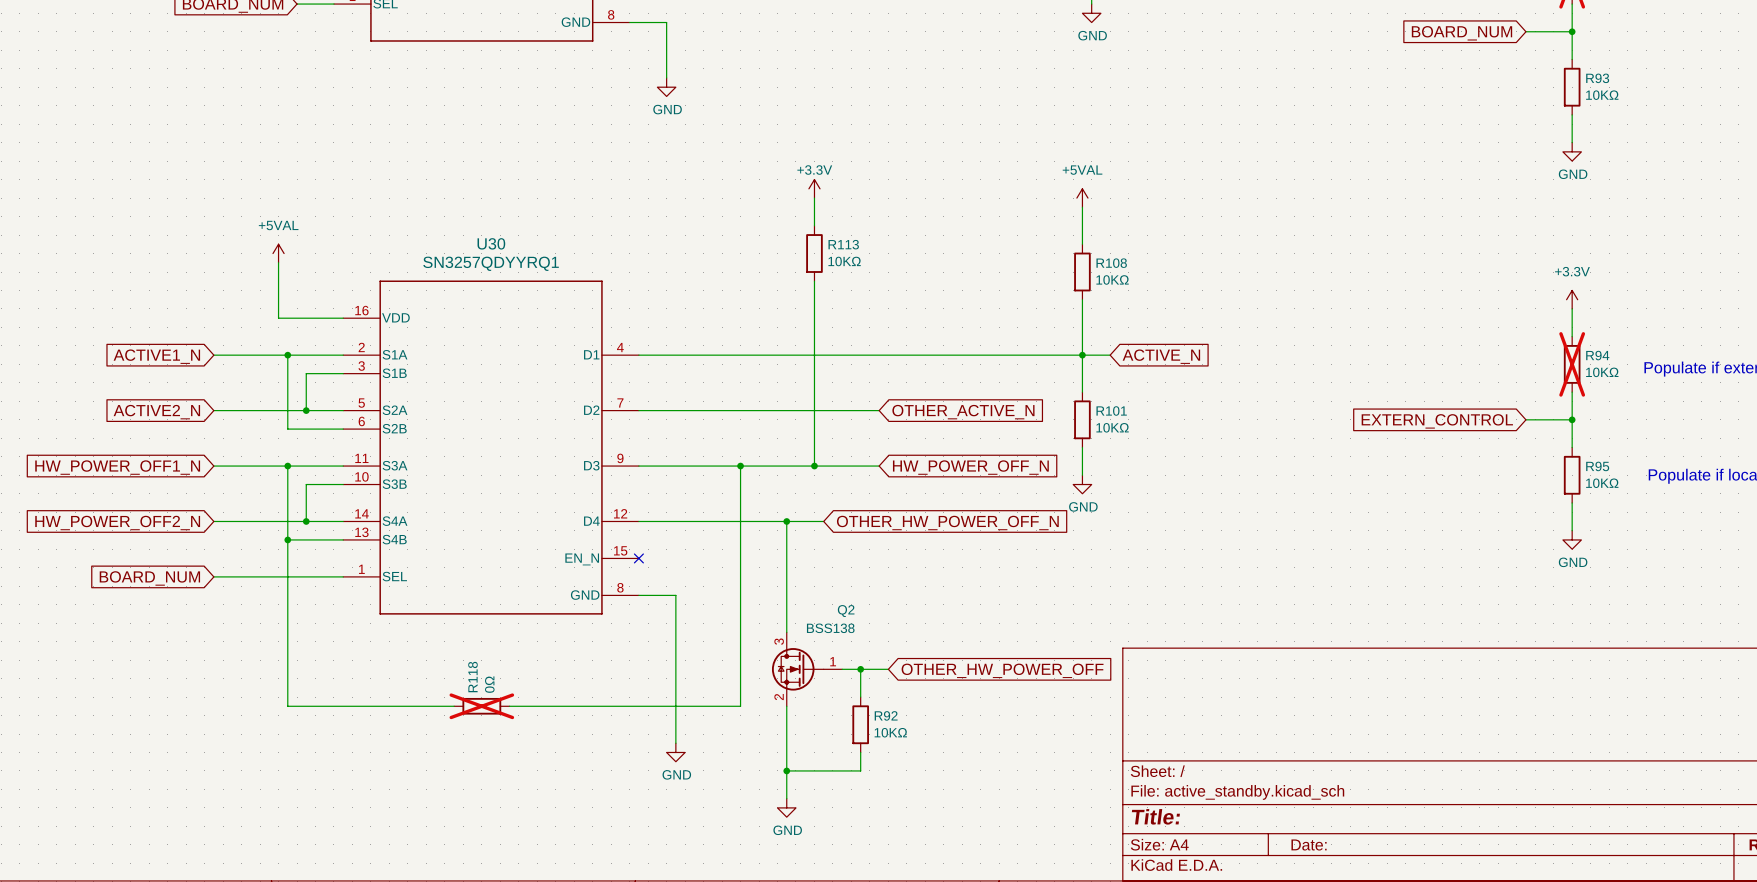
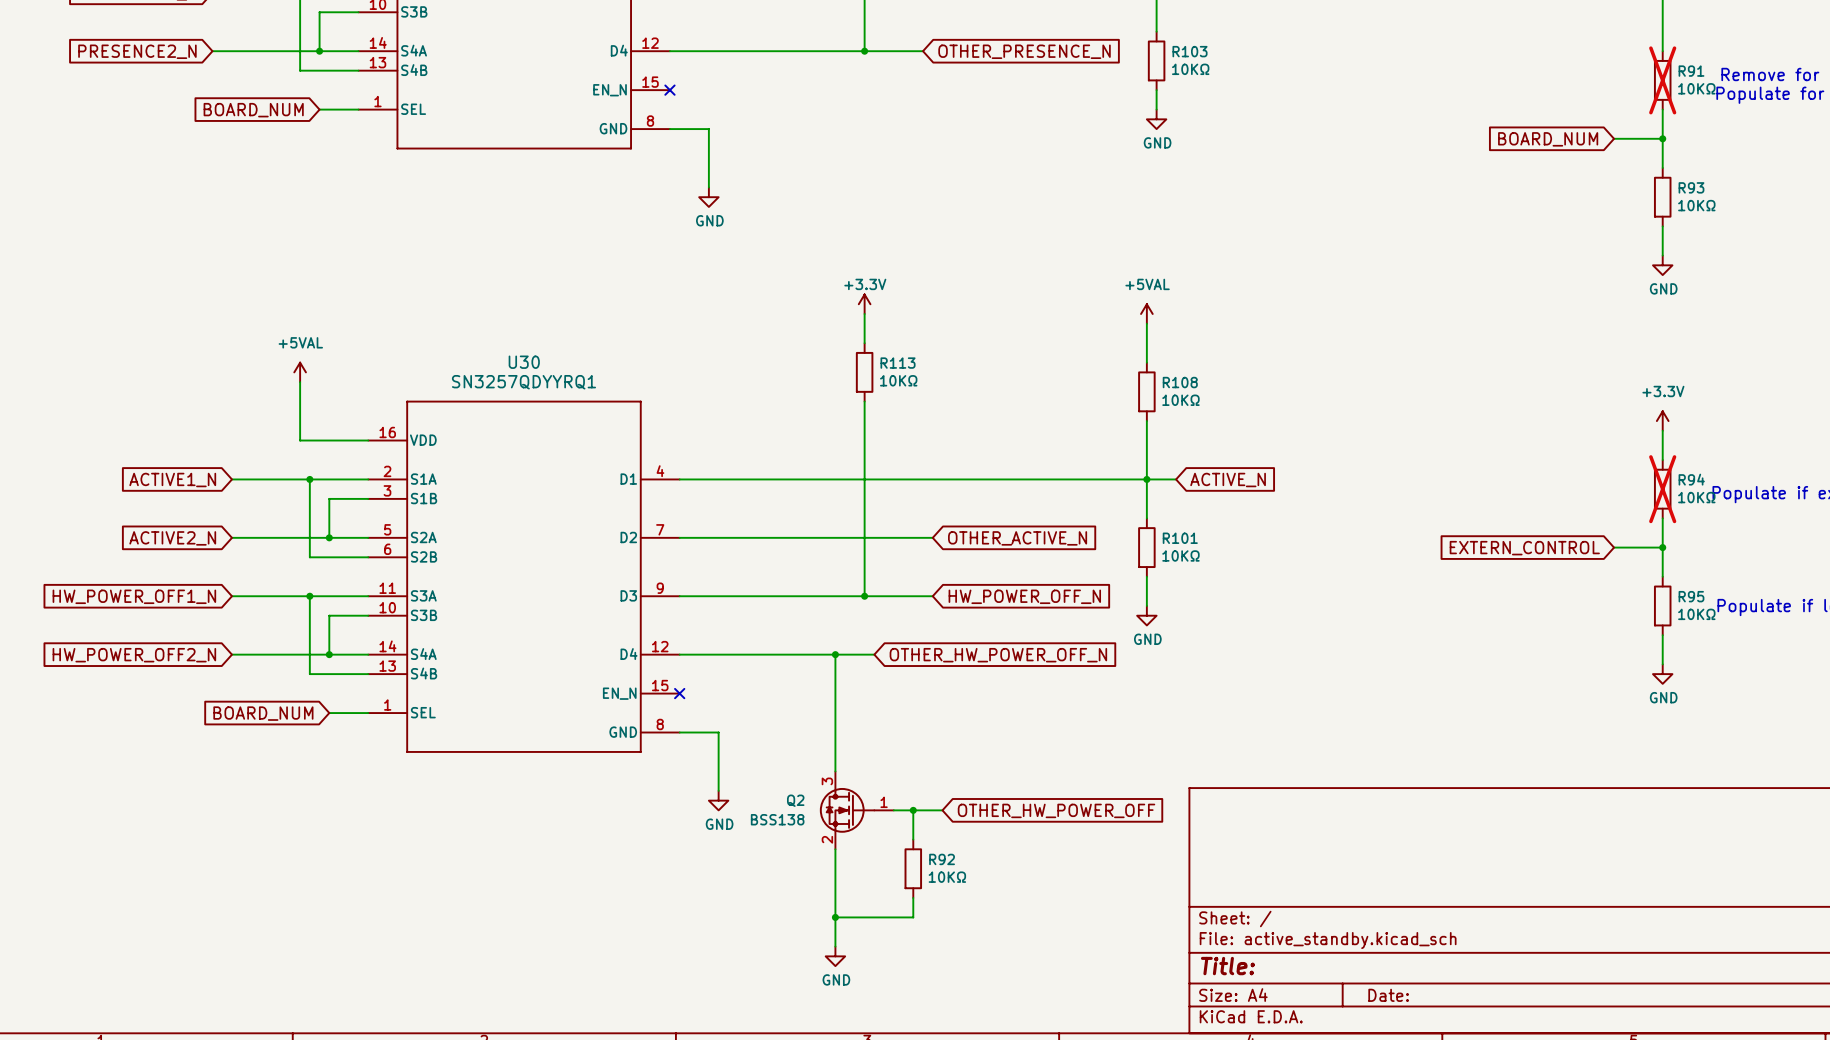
wire: (740, 466) (740, 706) (509, 706) -> none
junction: (740, 466) -> none
wire: (287, 539) (287, 706) (454, 706) -> none
junction: (287, 539) -> none
wire: (213, 576) (306, 576) -> none
global label position: BOARD_NUM (149, 578) -> BOARD_NUM (263, 713)
Q2 name position: Q2 (846, 611) -> Q2 (795, 800)
Q2 value position: BSS138 (830, 628) -> BSS138 (777, 819)
wire: (675, 650) (675, 743) -> none
R118: 0Ω (481, 706) -> none
power symbol position: GND (675, 752) -> GND (718, 800)

